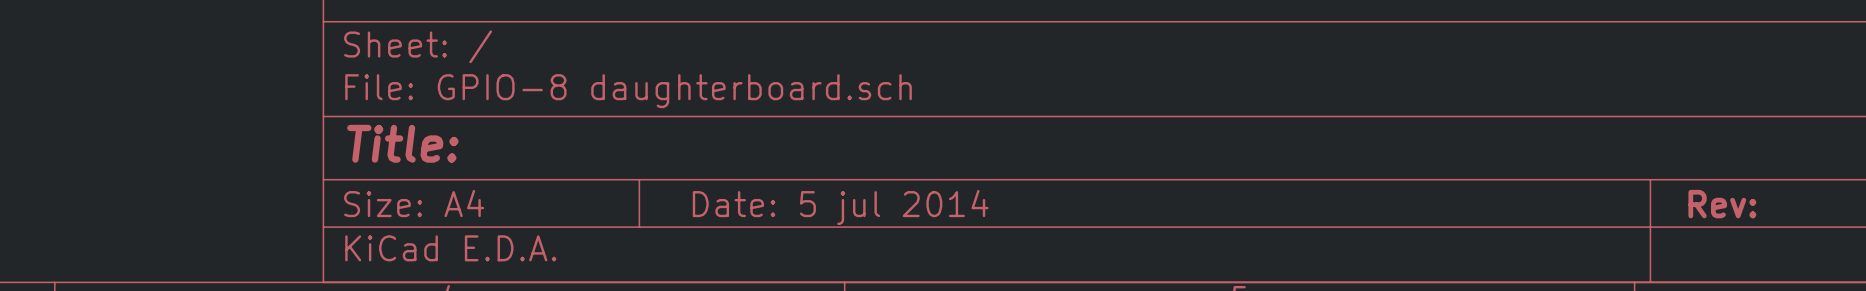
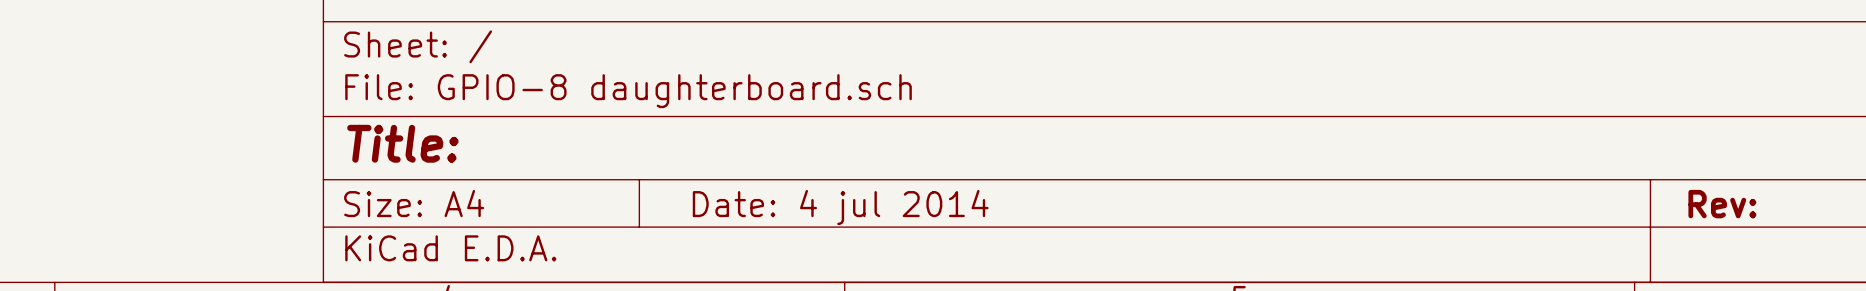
title block: Date: 5 jul 2014 (840, 207) -> Date: 4 jul 2014 (840, 207)

